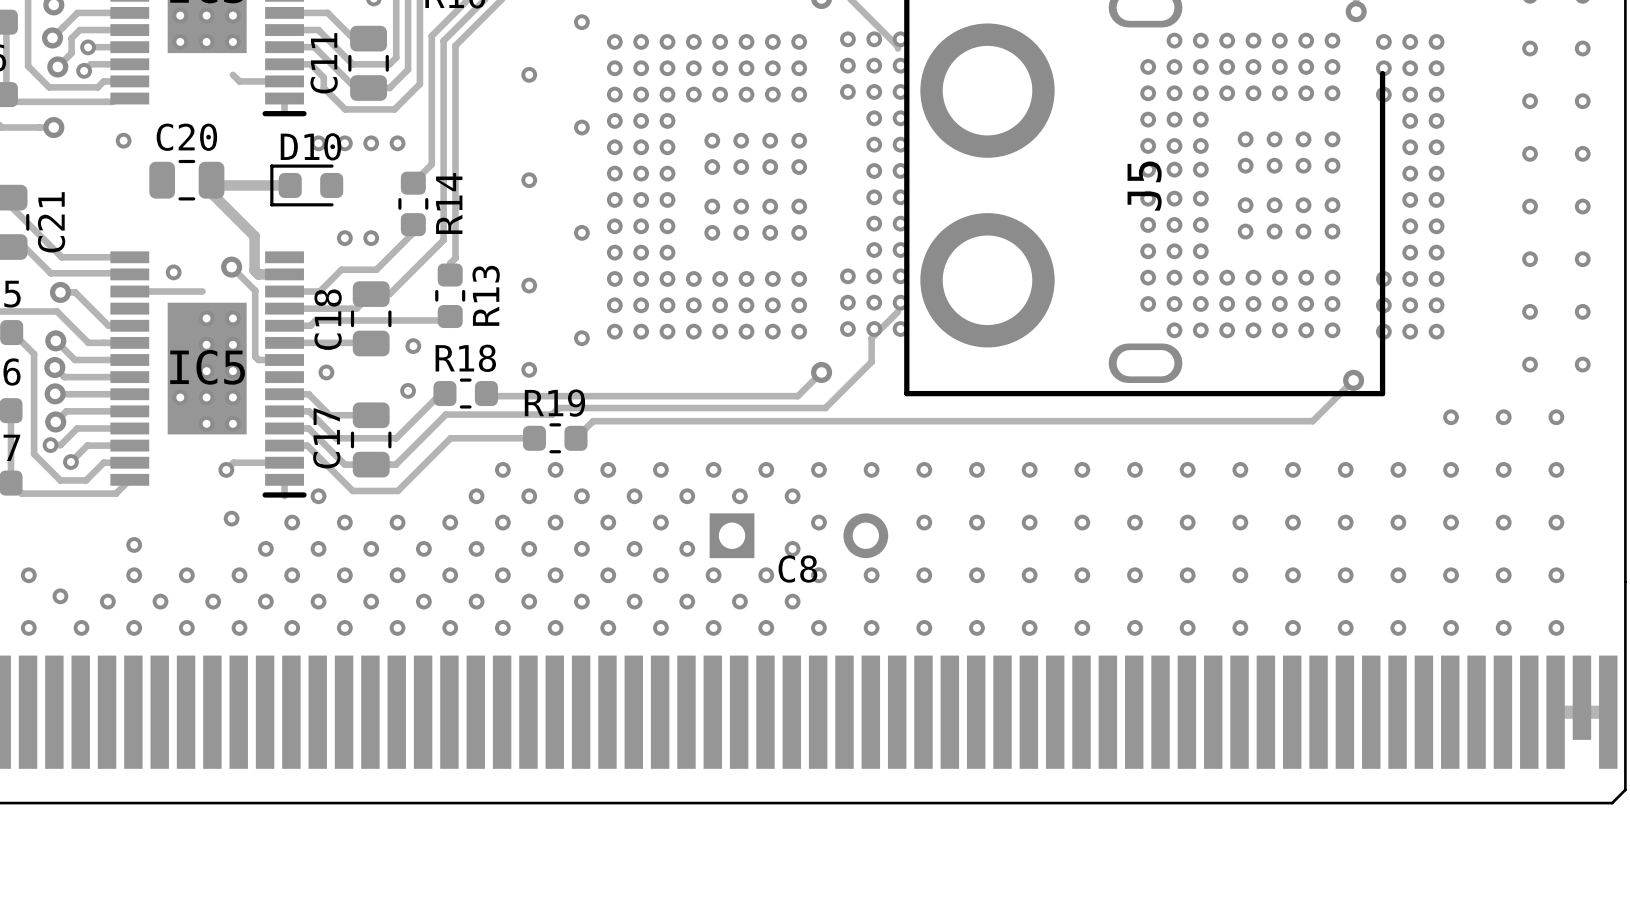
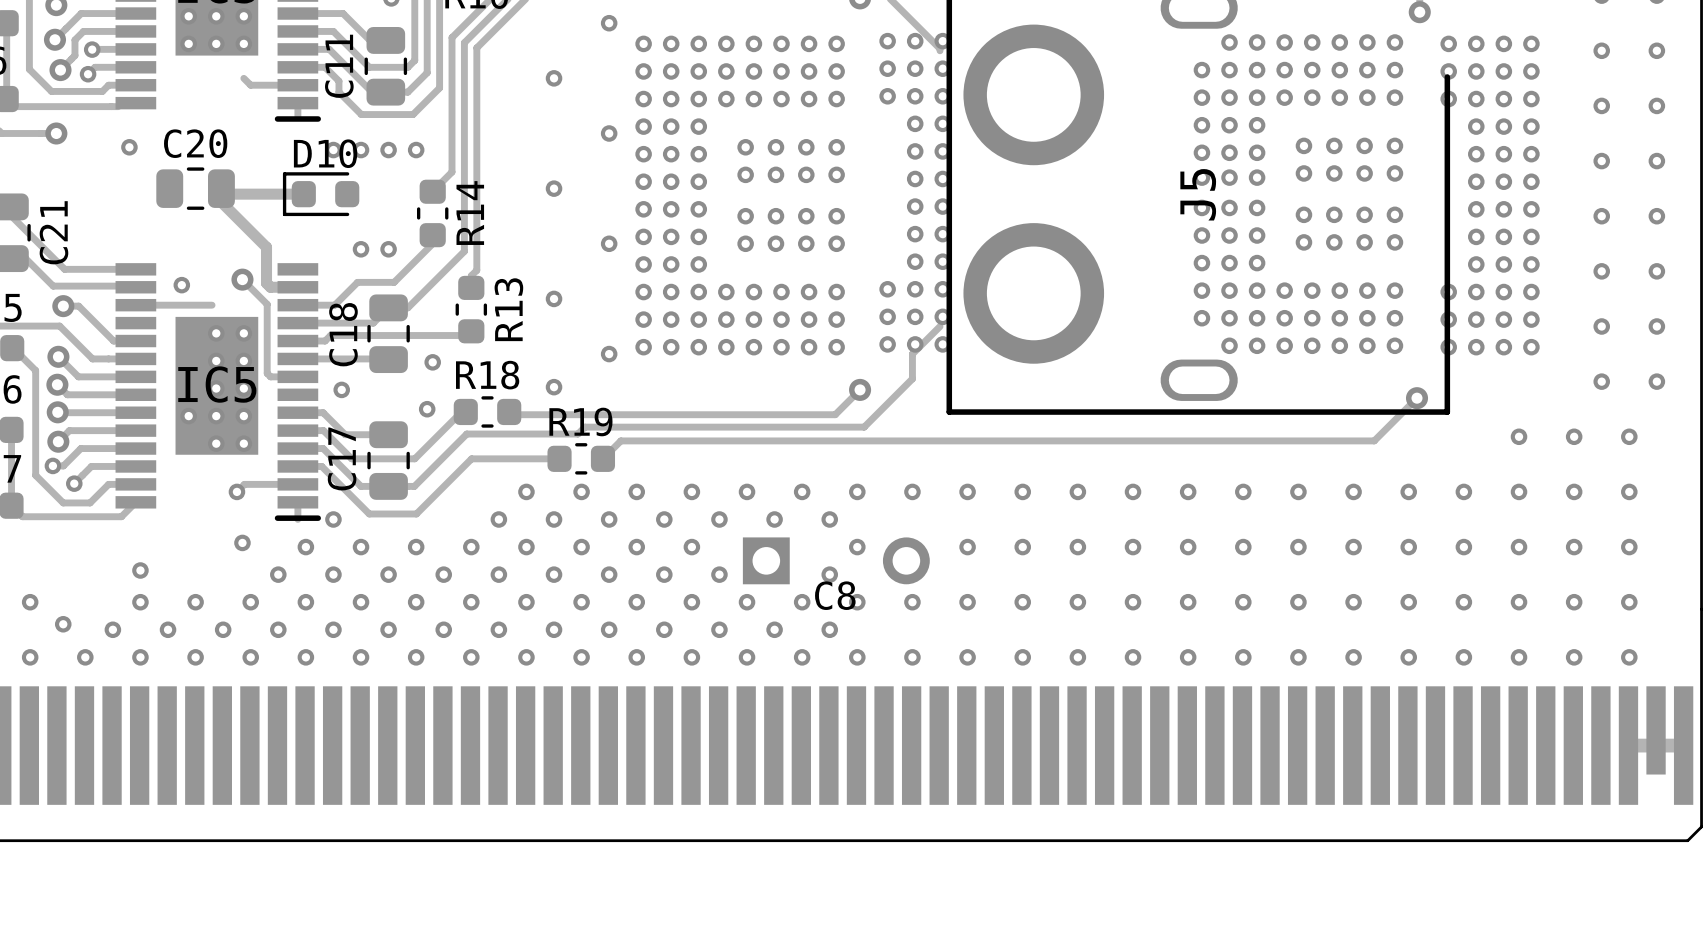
via: none -> (1531, 43)
via: none -> (1531, 71)
via: none -> (1531, 99)
via: none -> (1531, 126)
via: none -> (1531, 154)
via: none -> (1531, 181)
via: none -> (1531, 209)
via: none -> (1531, 236)
via: none -> (1531, 264)
via: none -> (1531, 292)
via: none -> (1531, 319)
via: none -> (1531, 347)

